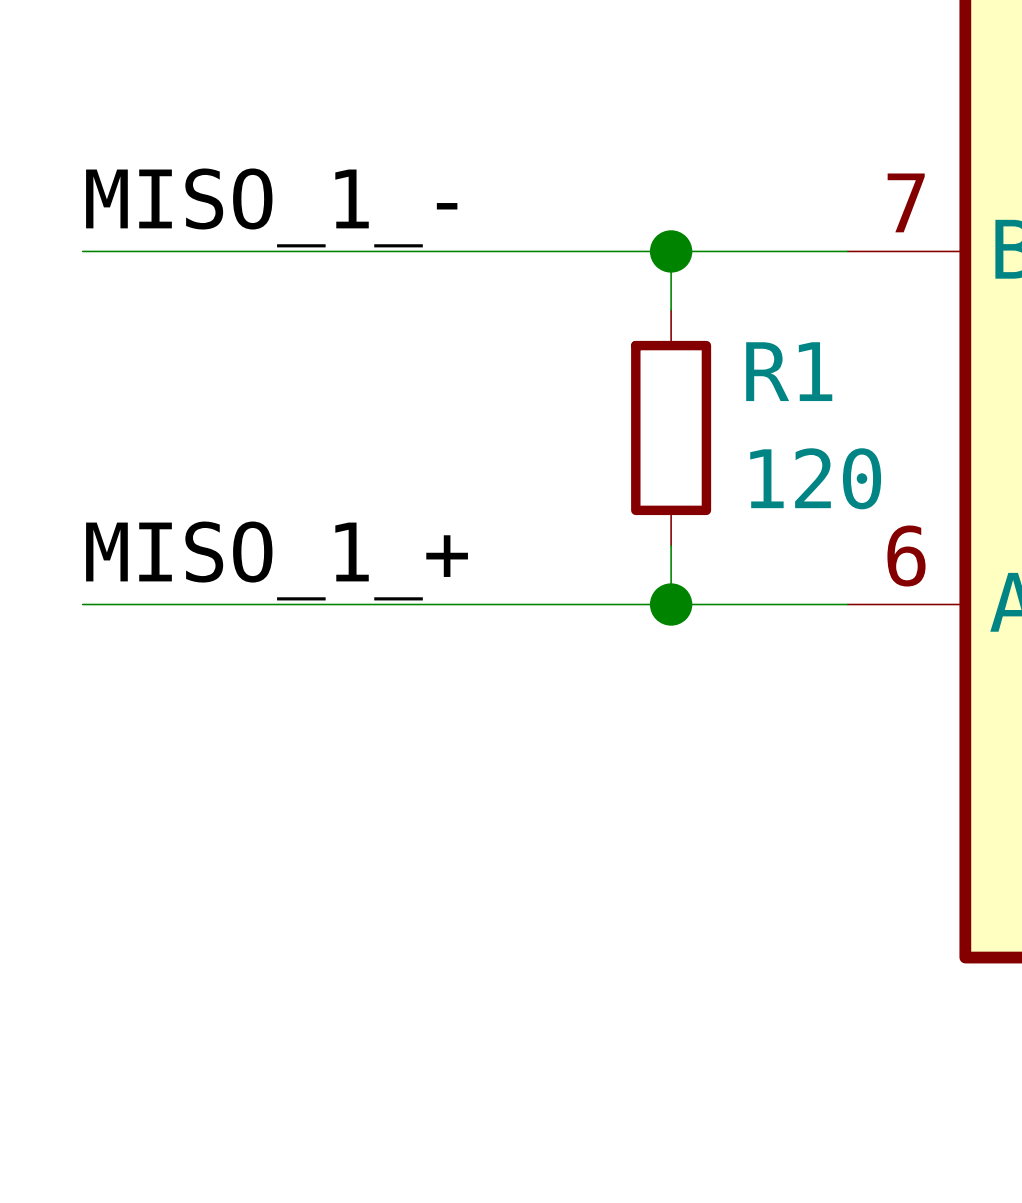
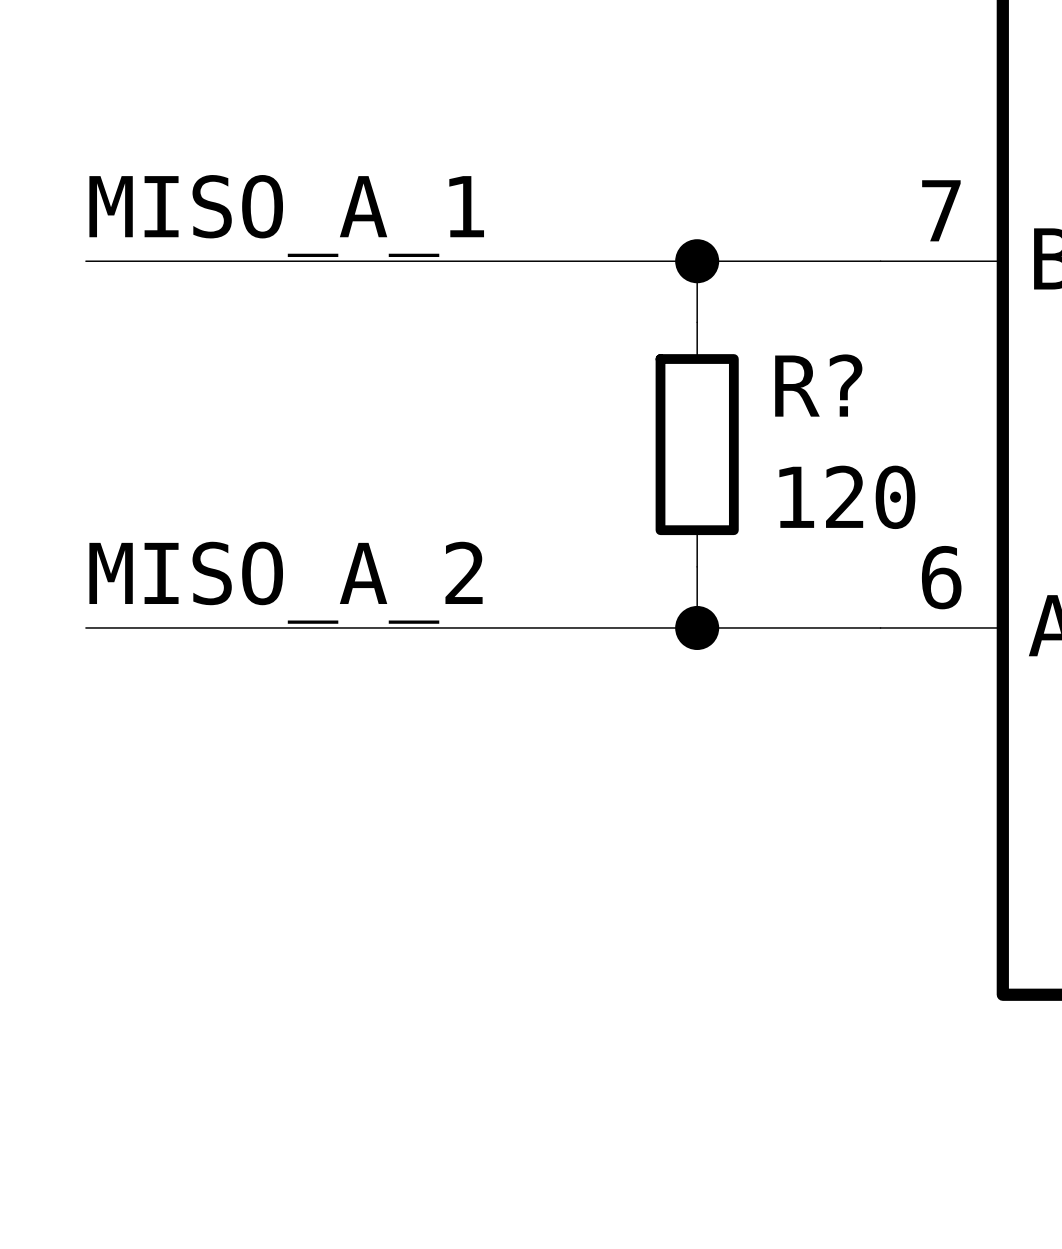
label: MISO_1_- (271, 207) -> MISO_A_1 (286, 216)
R1 name: R1 (789, 371) -> R? (818, 385)
label: MISO_1_+ (277, 560) -> MISO_A_2 (286, 582)

